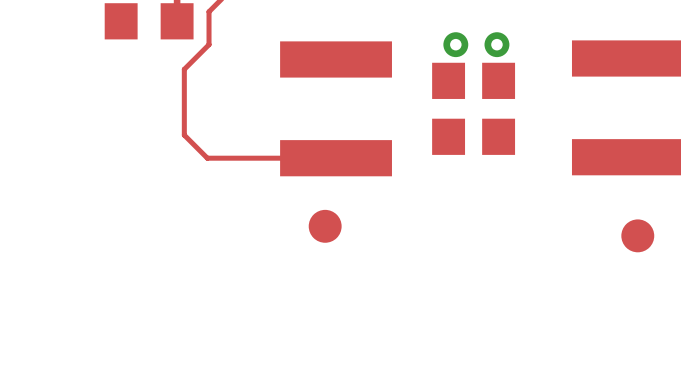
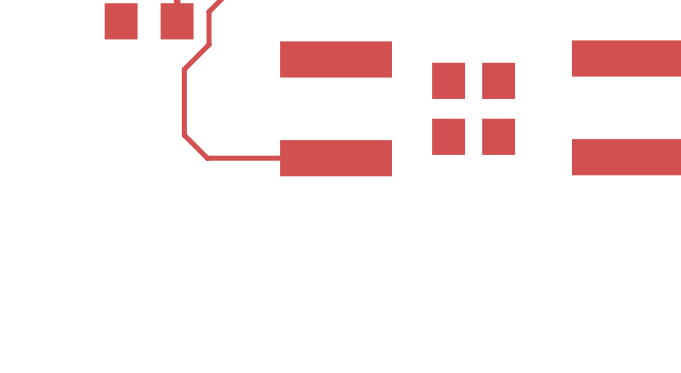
via: (455, 44) -> none
via: (496, 44) -> none
part: (325, 226) -> none
part: (637, 235) -> none

